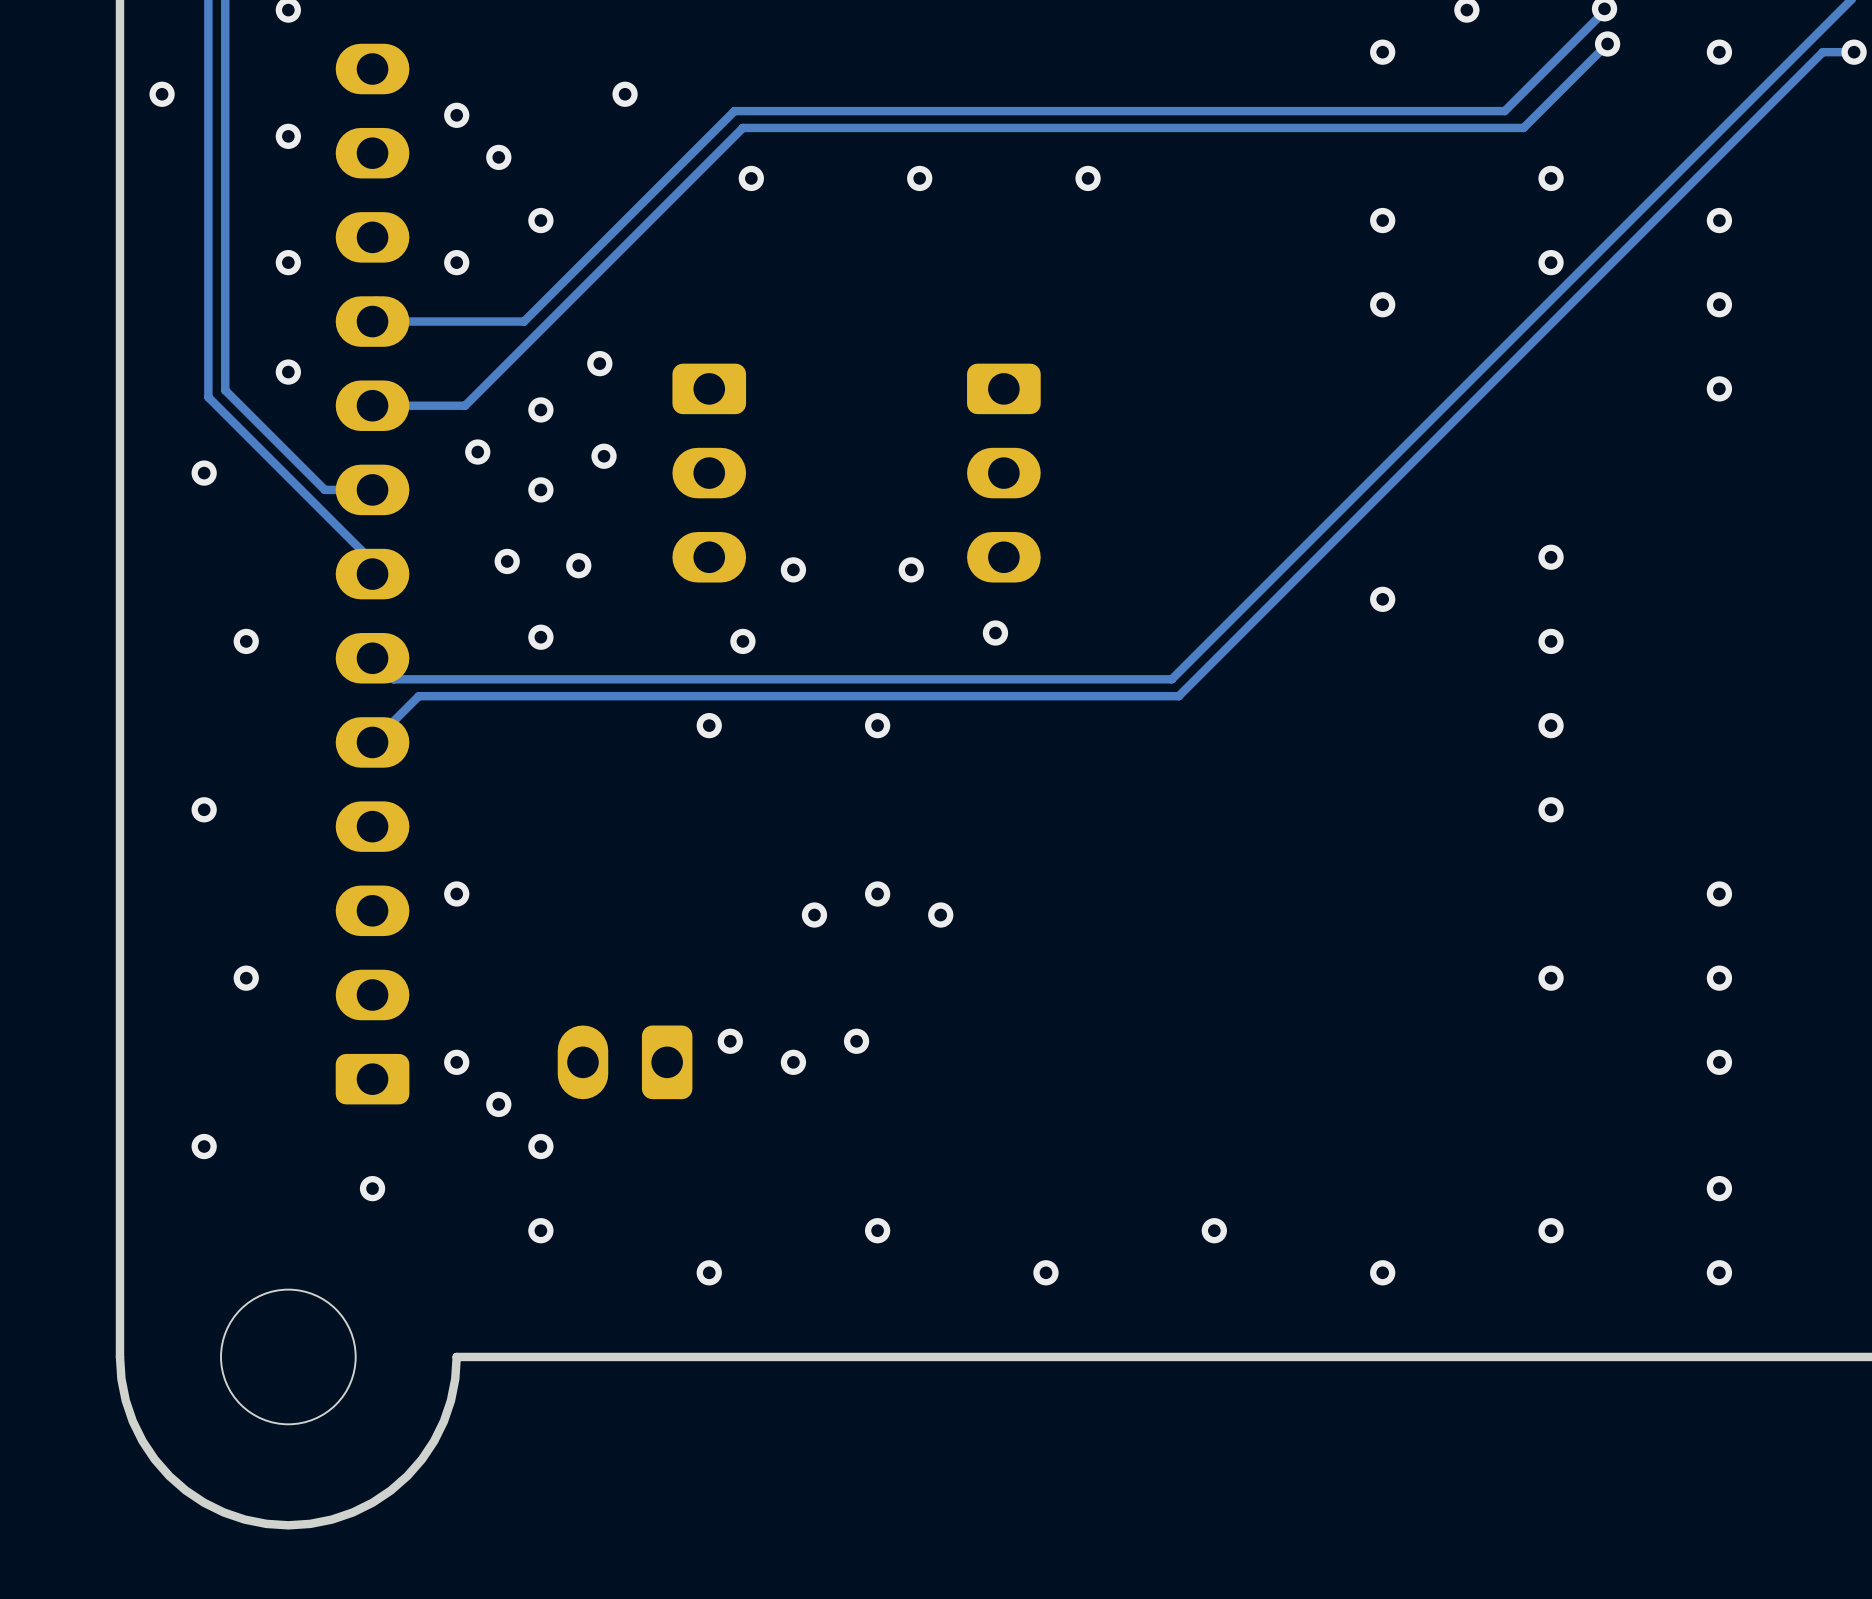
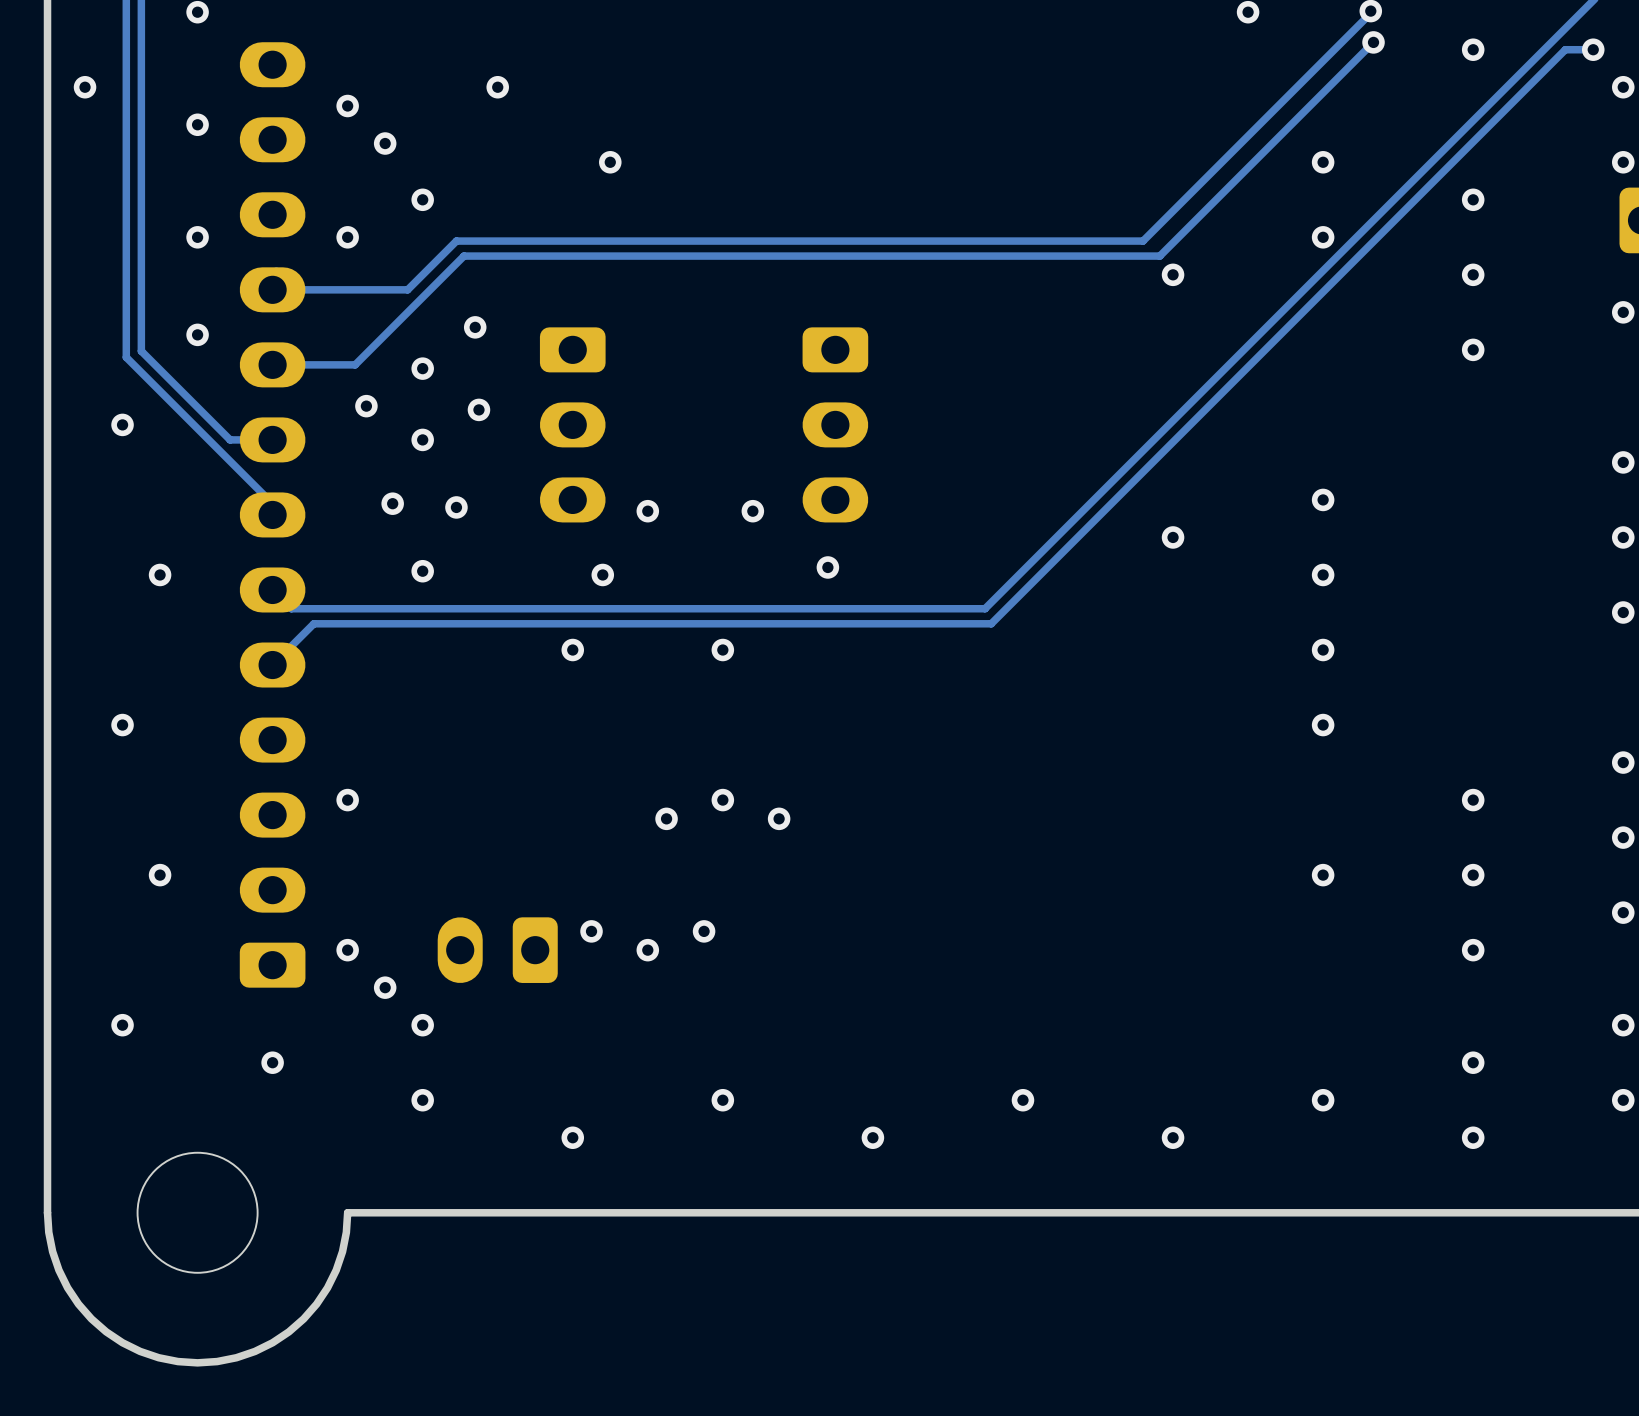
via: (1382, 52) -> none
track: (1504, 111) (734, 111) (578, 266) -> (1281, 102) (1143, 241) (456, 241)
track: (1523, 127) (742, 127) (587, 283) -> (1298, 117) (1159, 256) (463, 256)
via: (919, 178) -> none
via: (1088, 178) -> none
via: (1382, 220) -> none

